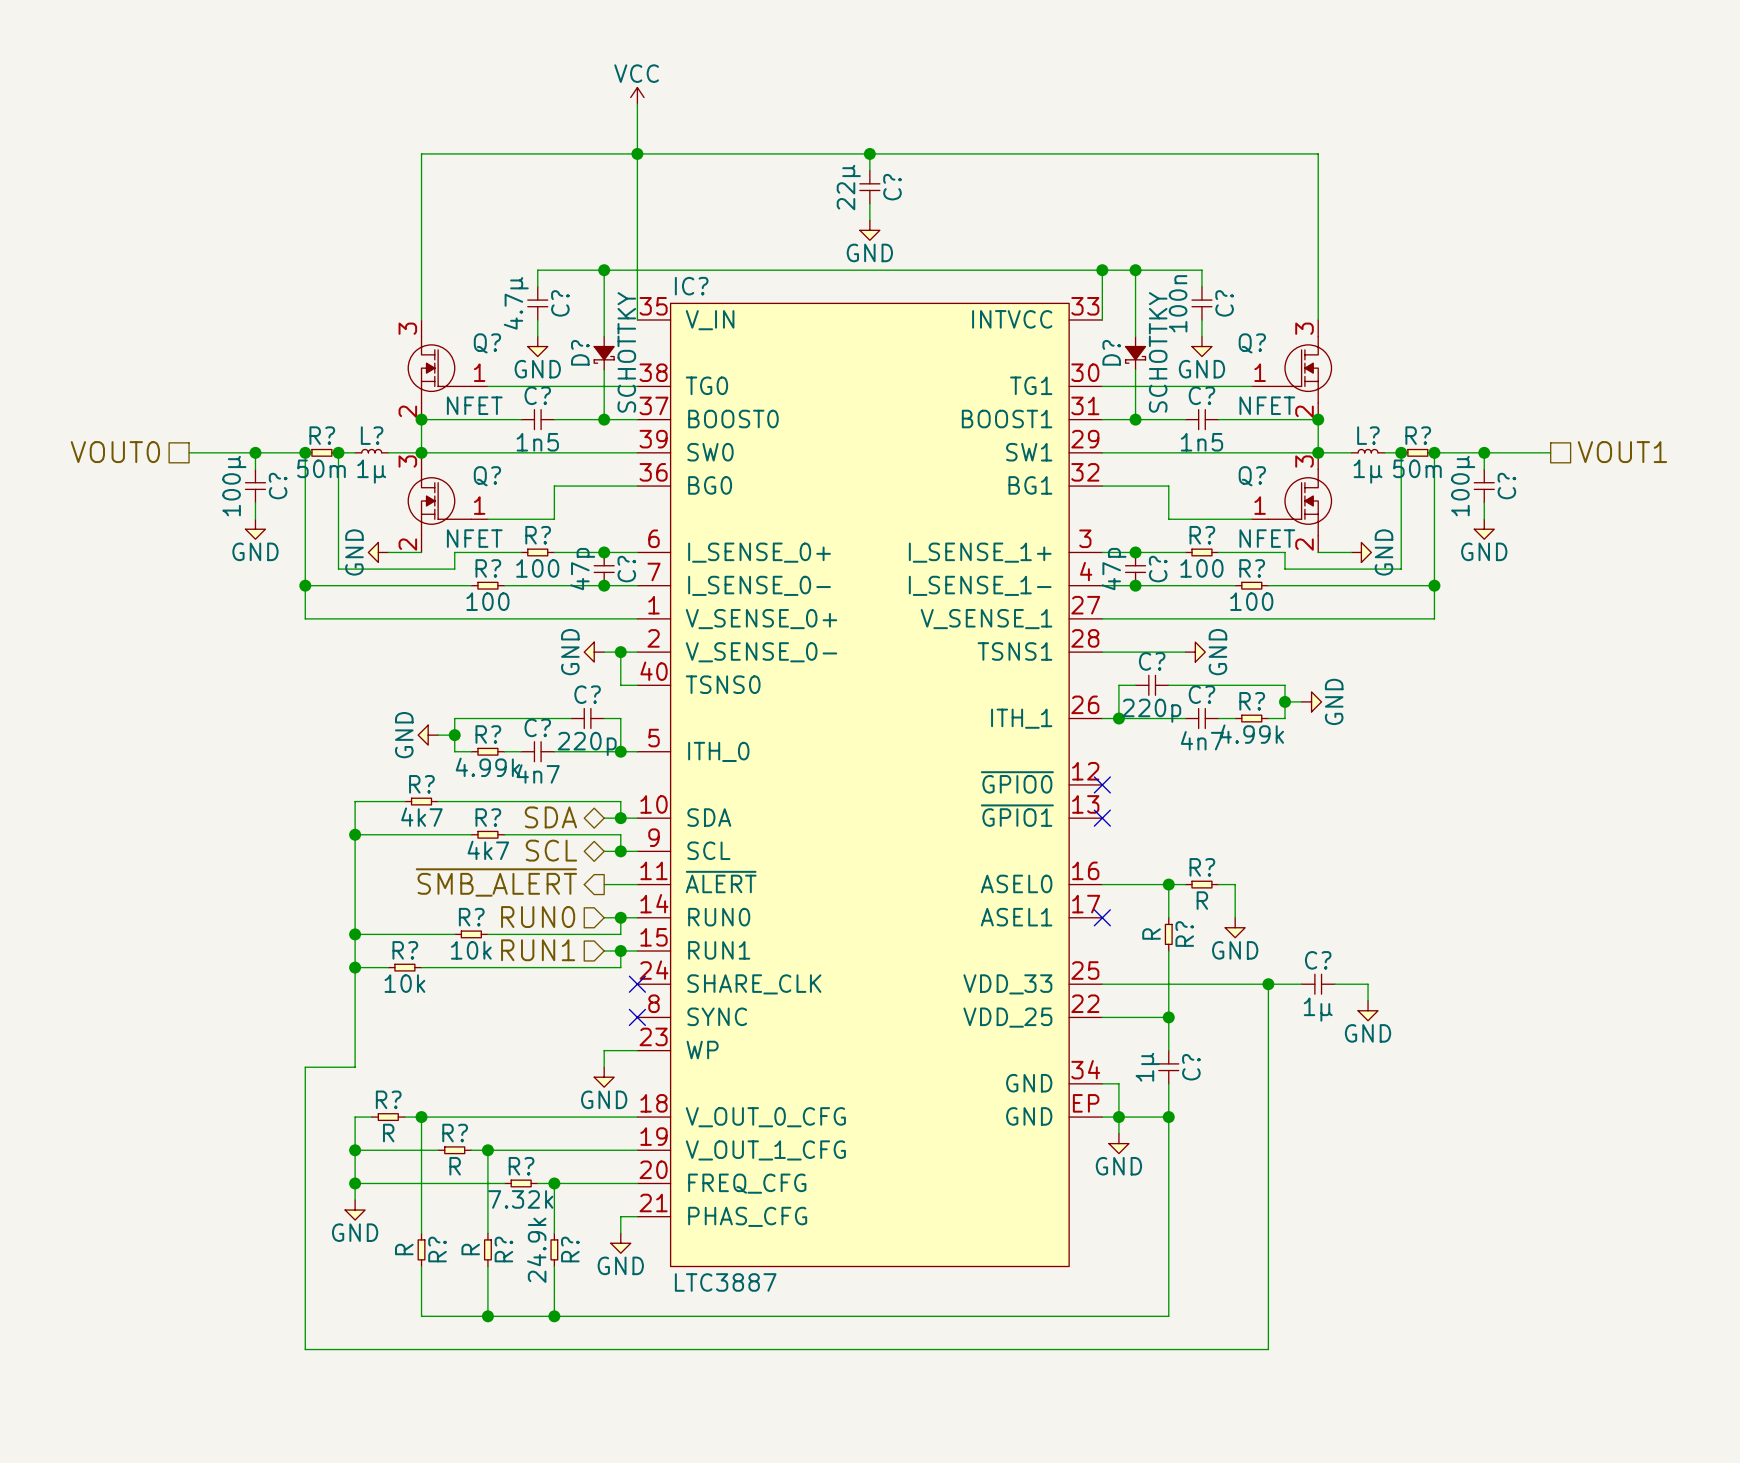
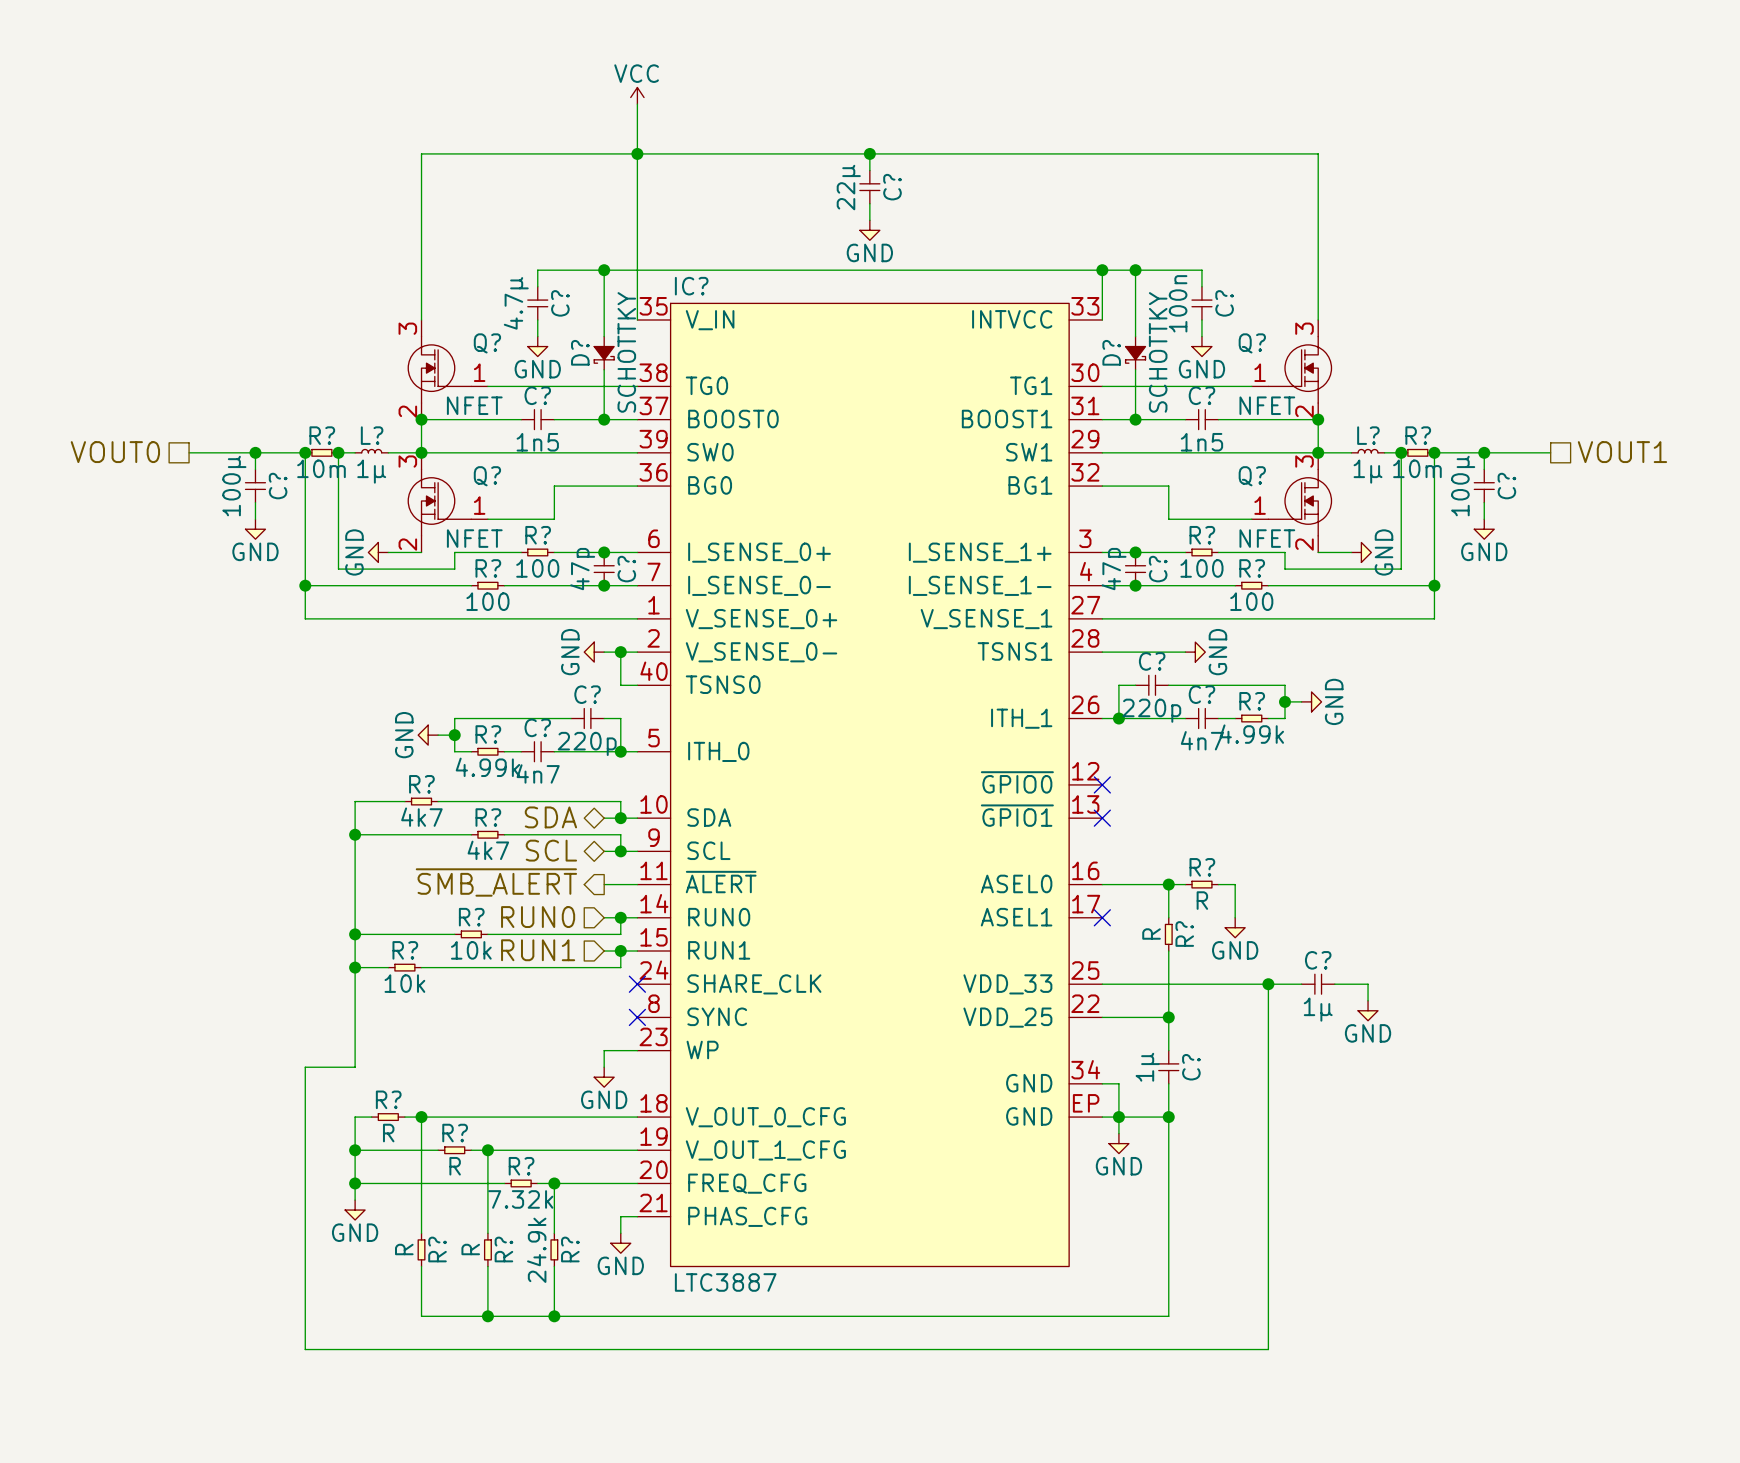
R? value: 50m (321, 468) -> 10m (321, 468)
R? value: 50m (1417, 468) -> 10m (1417, 468)

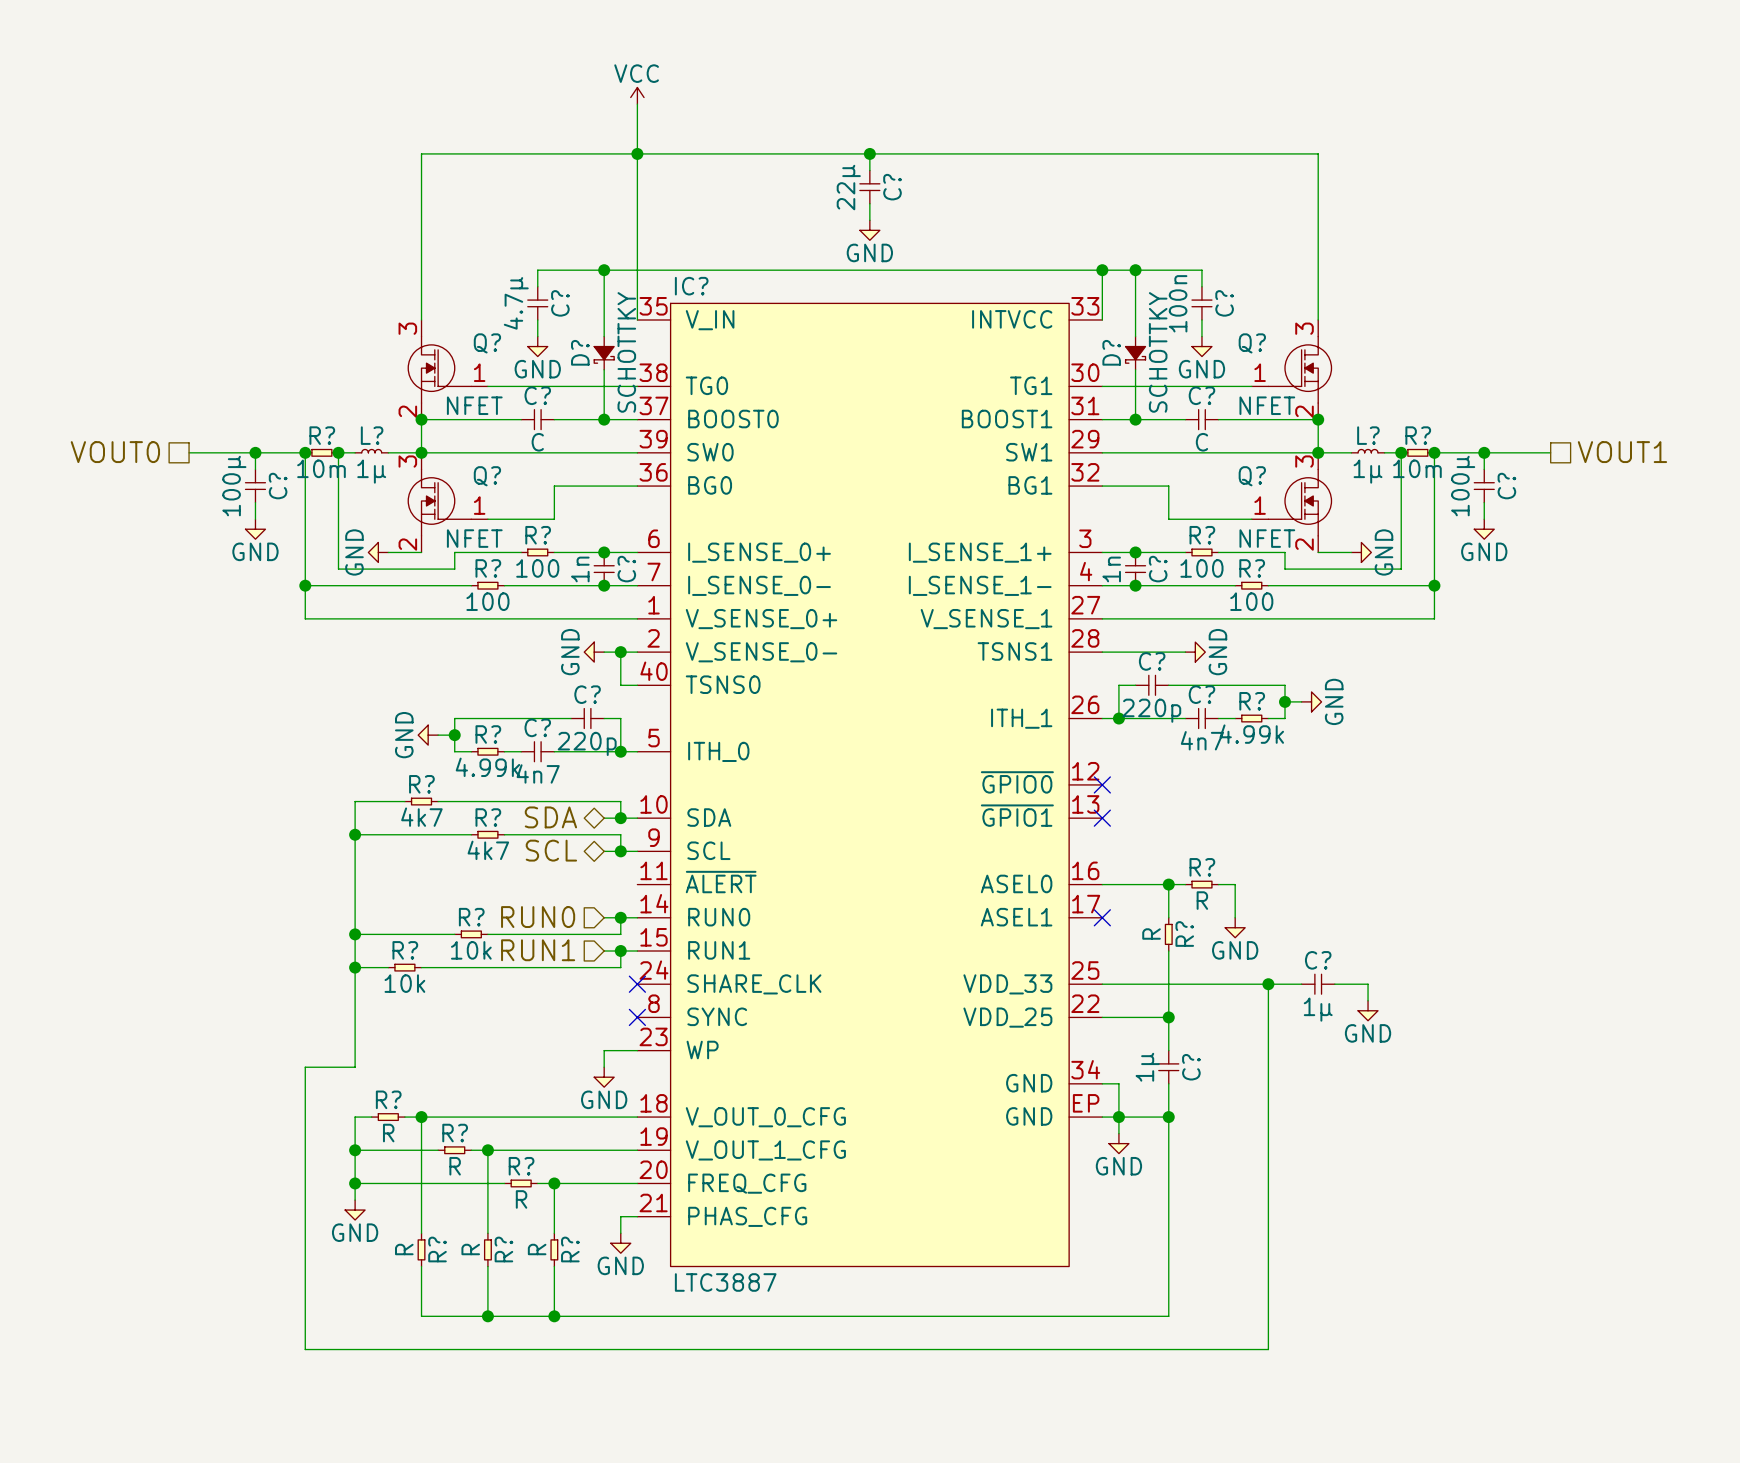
C? value: 1n5 (537, 442) -> C (537, 442)
C? value: 1n5 (1201, 442) -> C (1201, 442)
C? value: 47p (582, 569) -> 1n (580, 569)
C? value: 47p (1114, 569) -> 1n (1111, 569)
hierarchical label: ~{SMB_ALERT} (496, 882) -> none
wire: (604, 884) (637, 884) -> none
R? value: 7.32k (520, 1199) -> R (521, 1199)
R? value: 24.9k (536, 1250) -> R (537, 1249)

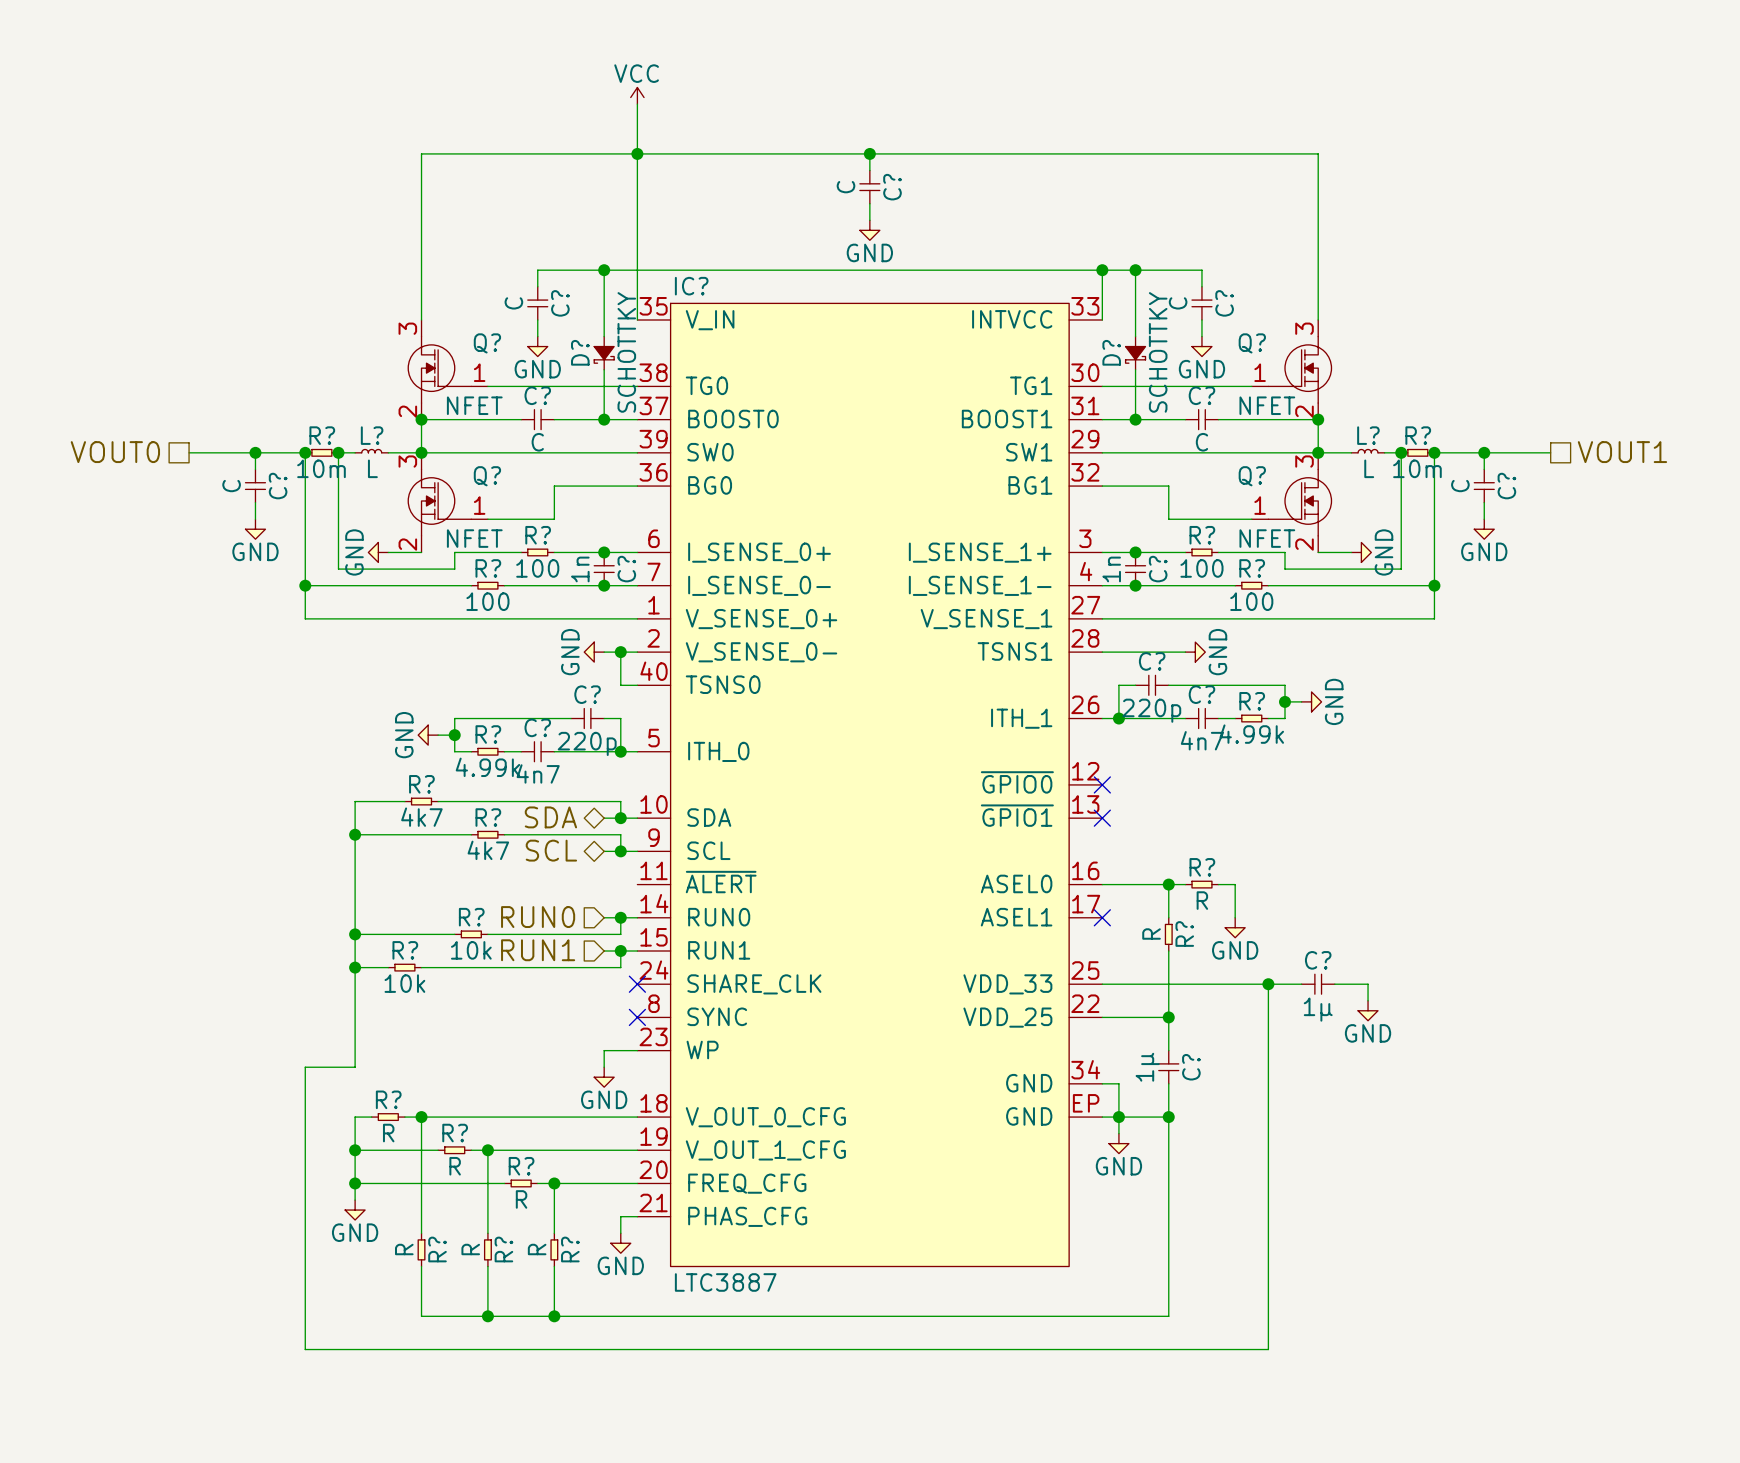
C? value: 22µ (848, 187) -> C (845, 187)
C? value: 4.7µ (516, 303) -> C (513, 303)
C? value: 100n (1178, 303) -> C (1178, 303)
L? value: 1µ (371, 471) -> L (372, 468)
L? value: 1µ (1368, 471) -> L (1369, 468)
C? value: 100µ (234, 486) -> C (231, 486)
C? value: 100µ (1463, 486) -> C (1460, 486)

